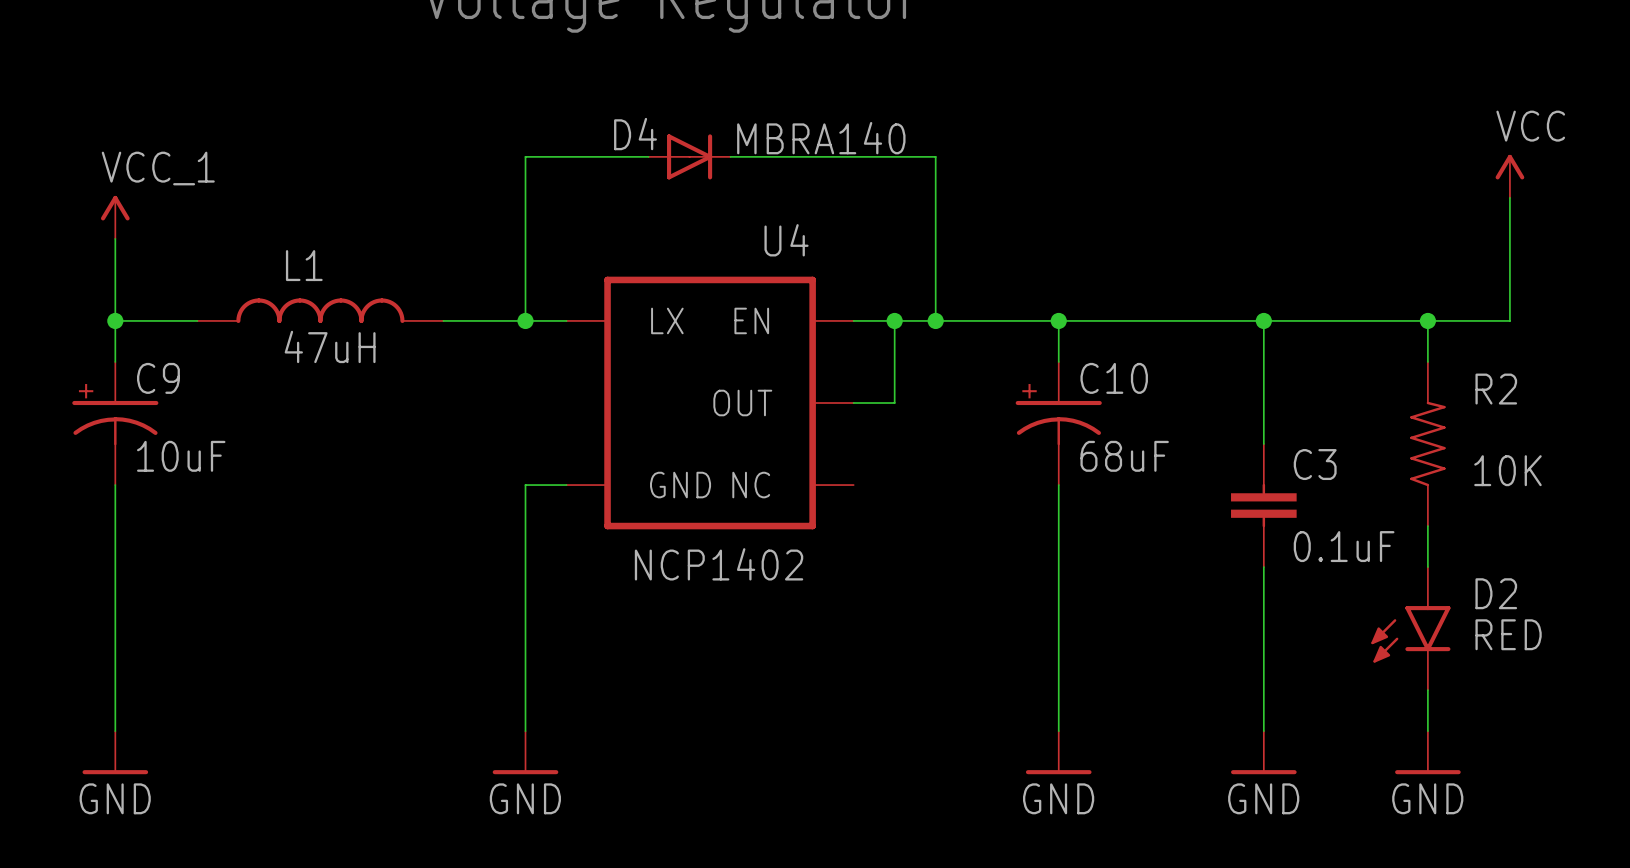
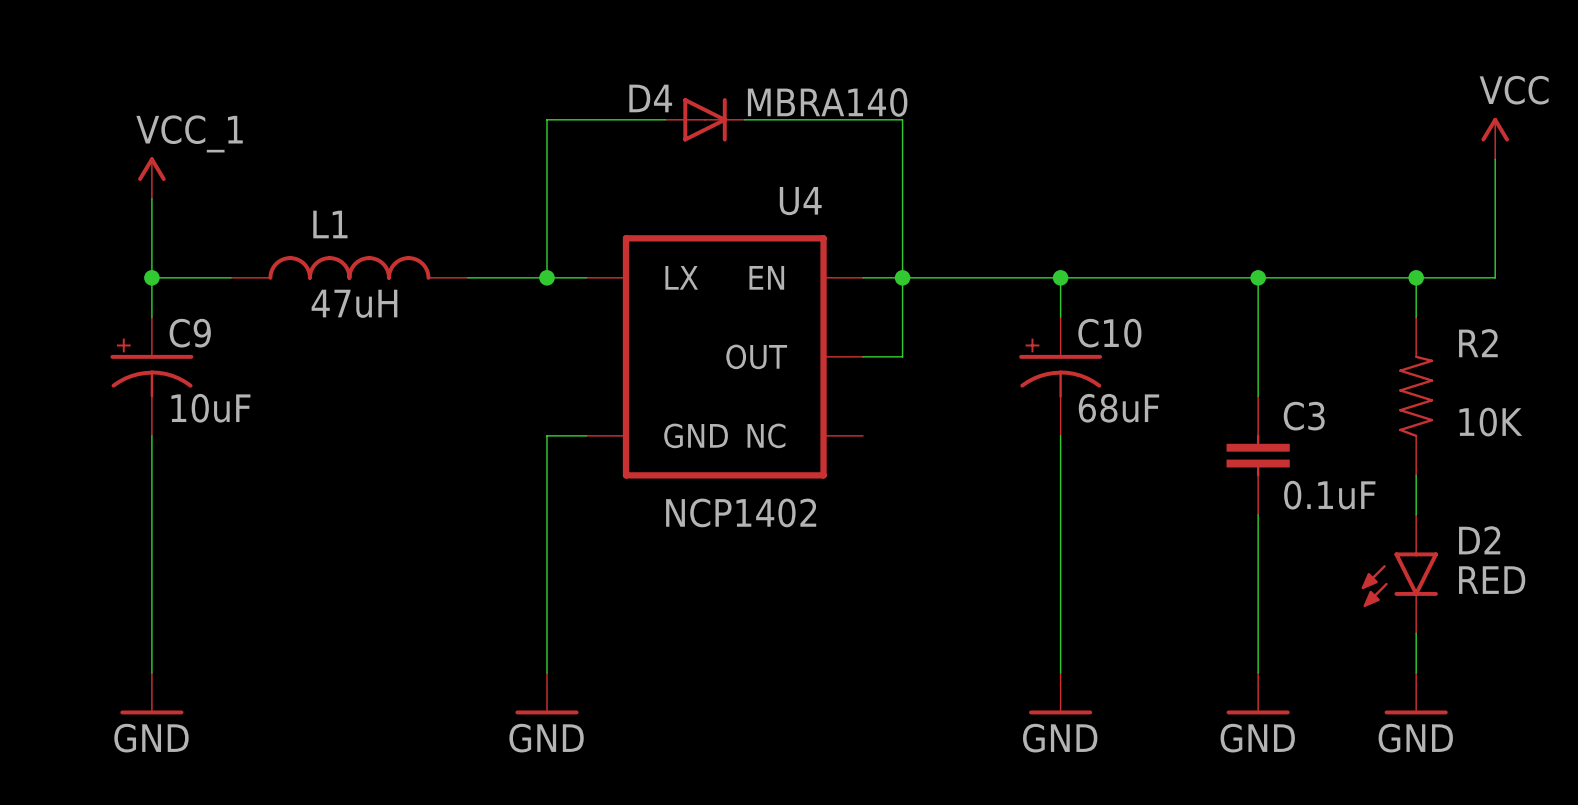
wire: (894, 156) (935, 156) (935, 320) -> (902, 119) (902, 277)
junction: (935, 320) -> none

